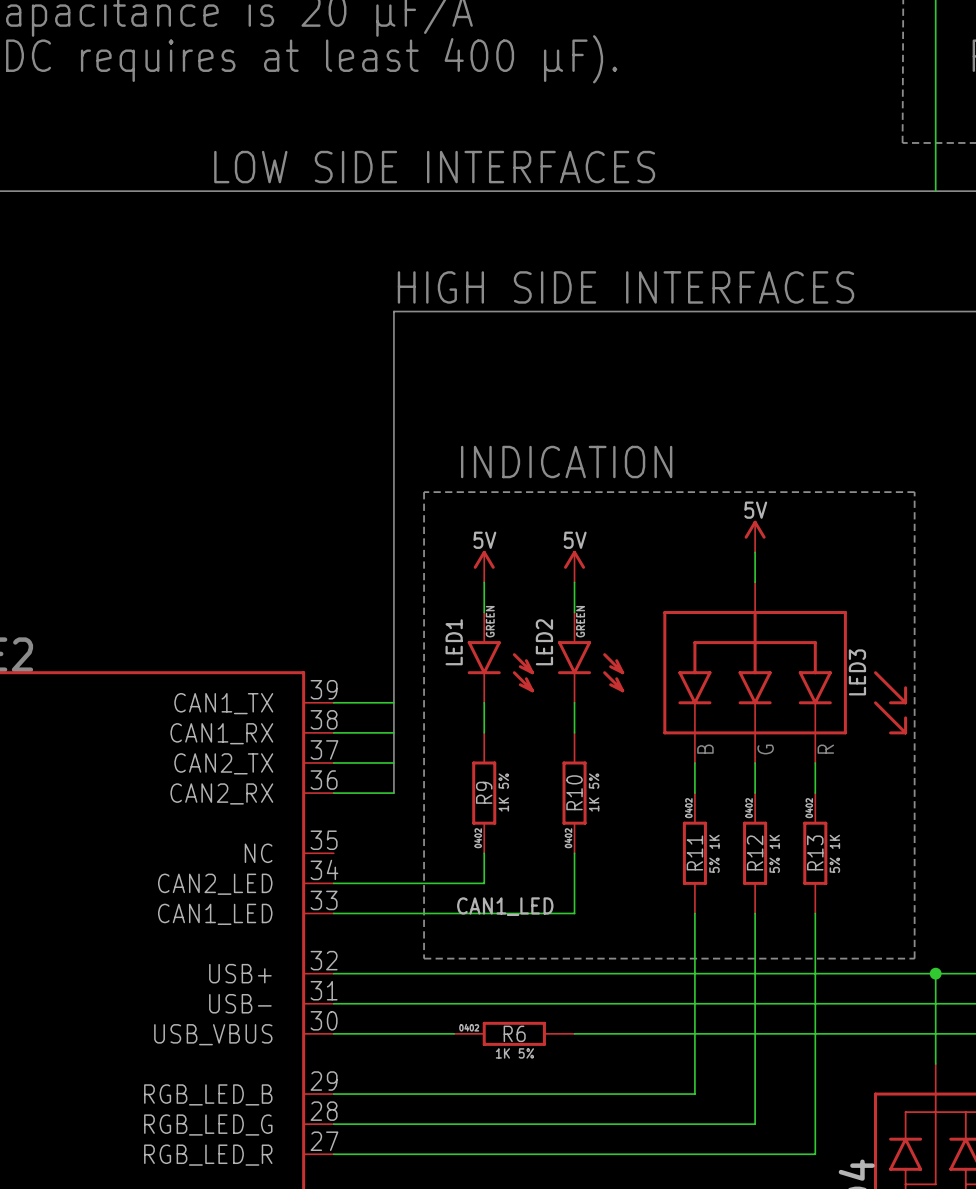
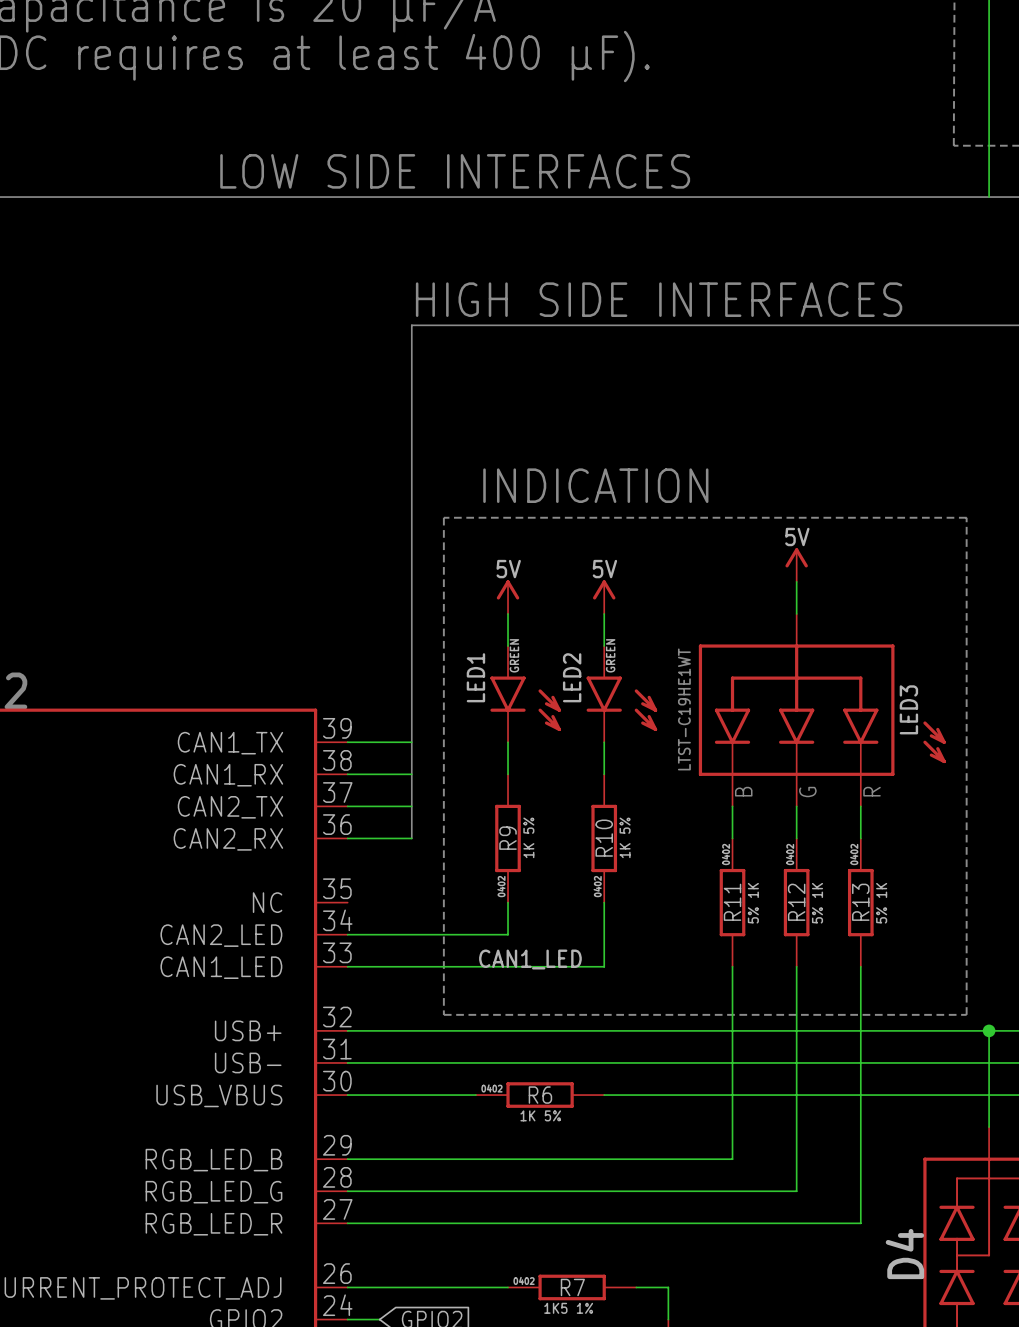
LED3 symbol: [663, 582, 908, 763] -> [698, 613, 946, 807]
LED3 text: none -> LTST-C19HE1WT (684, 709)

